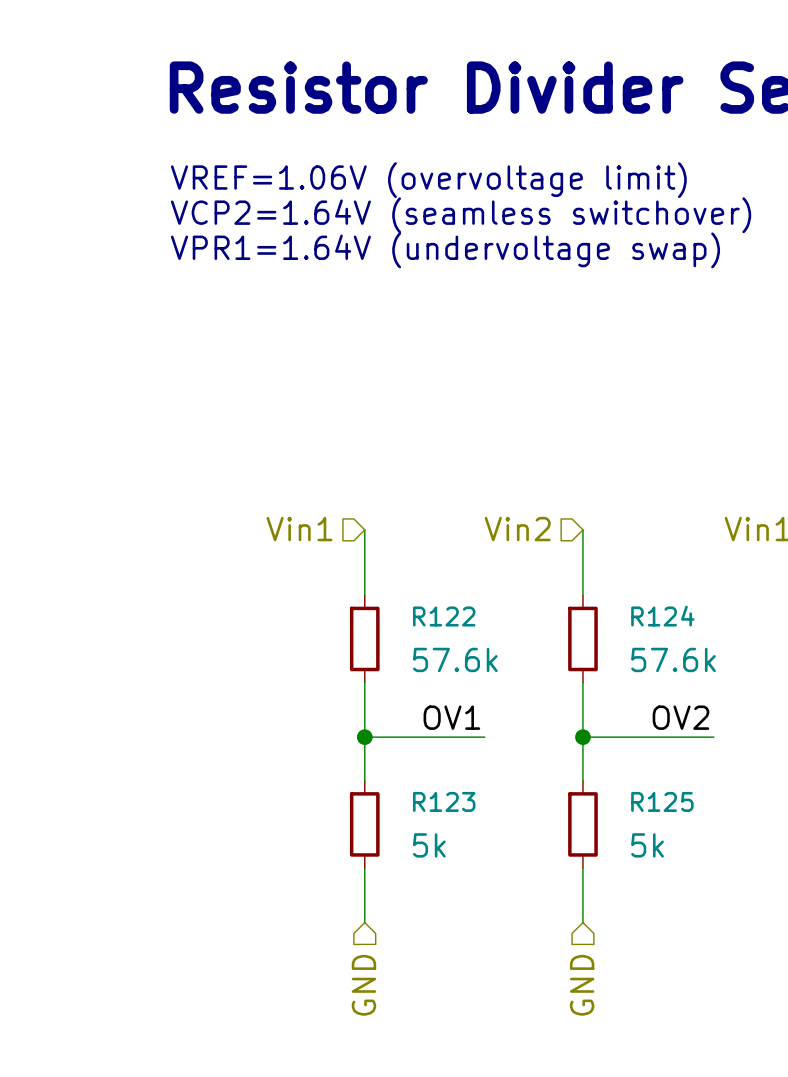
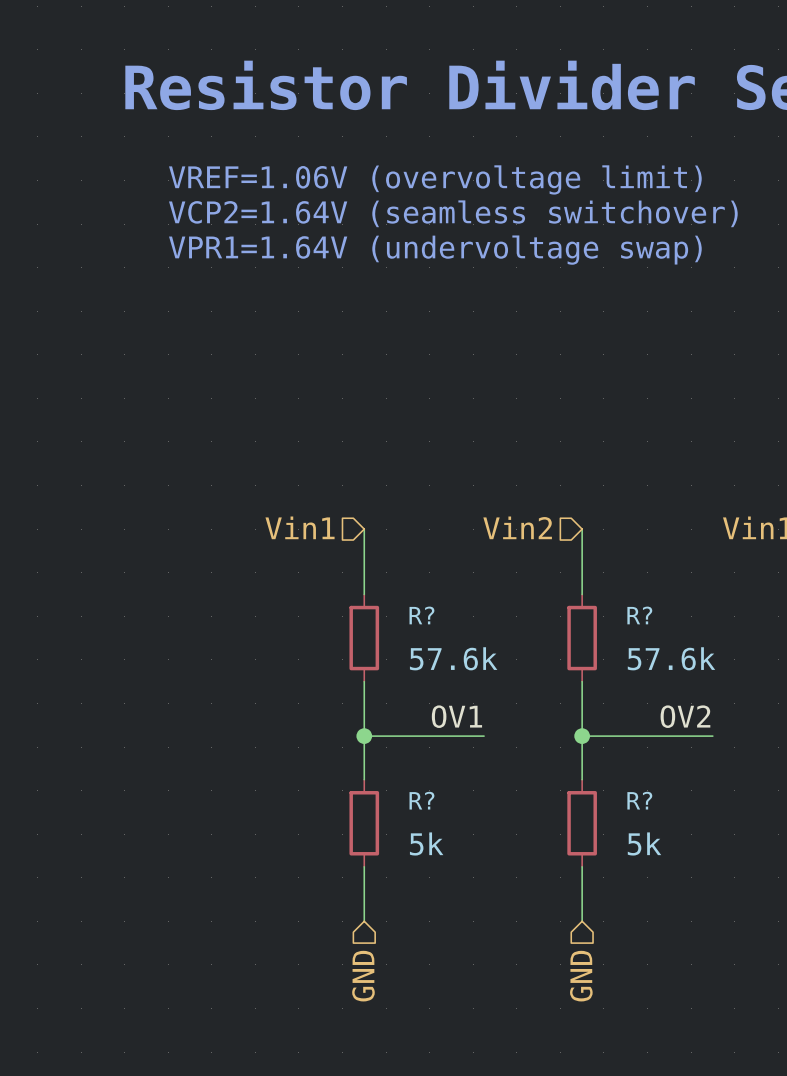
R122 name: R122 (444, 616) -> R? (421, 615)
R124 name: R124 (662, 616) -> R? (639, 615)
R123 name: R123 (444, 801) -> R? (421, 800)
R125 name: R125 (662, 801) -> R? (639, 800)

